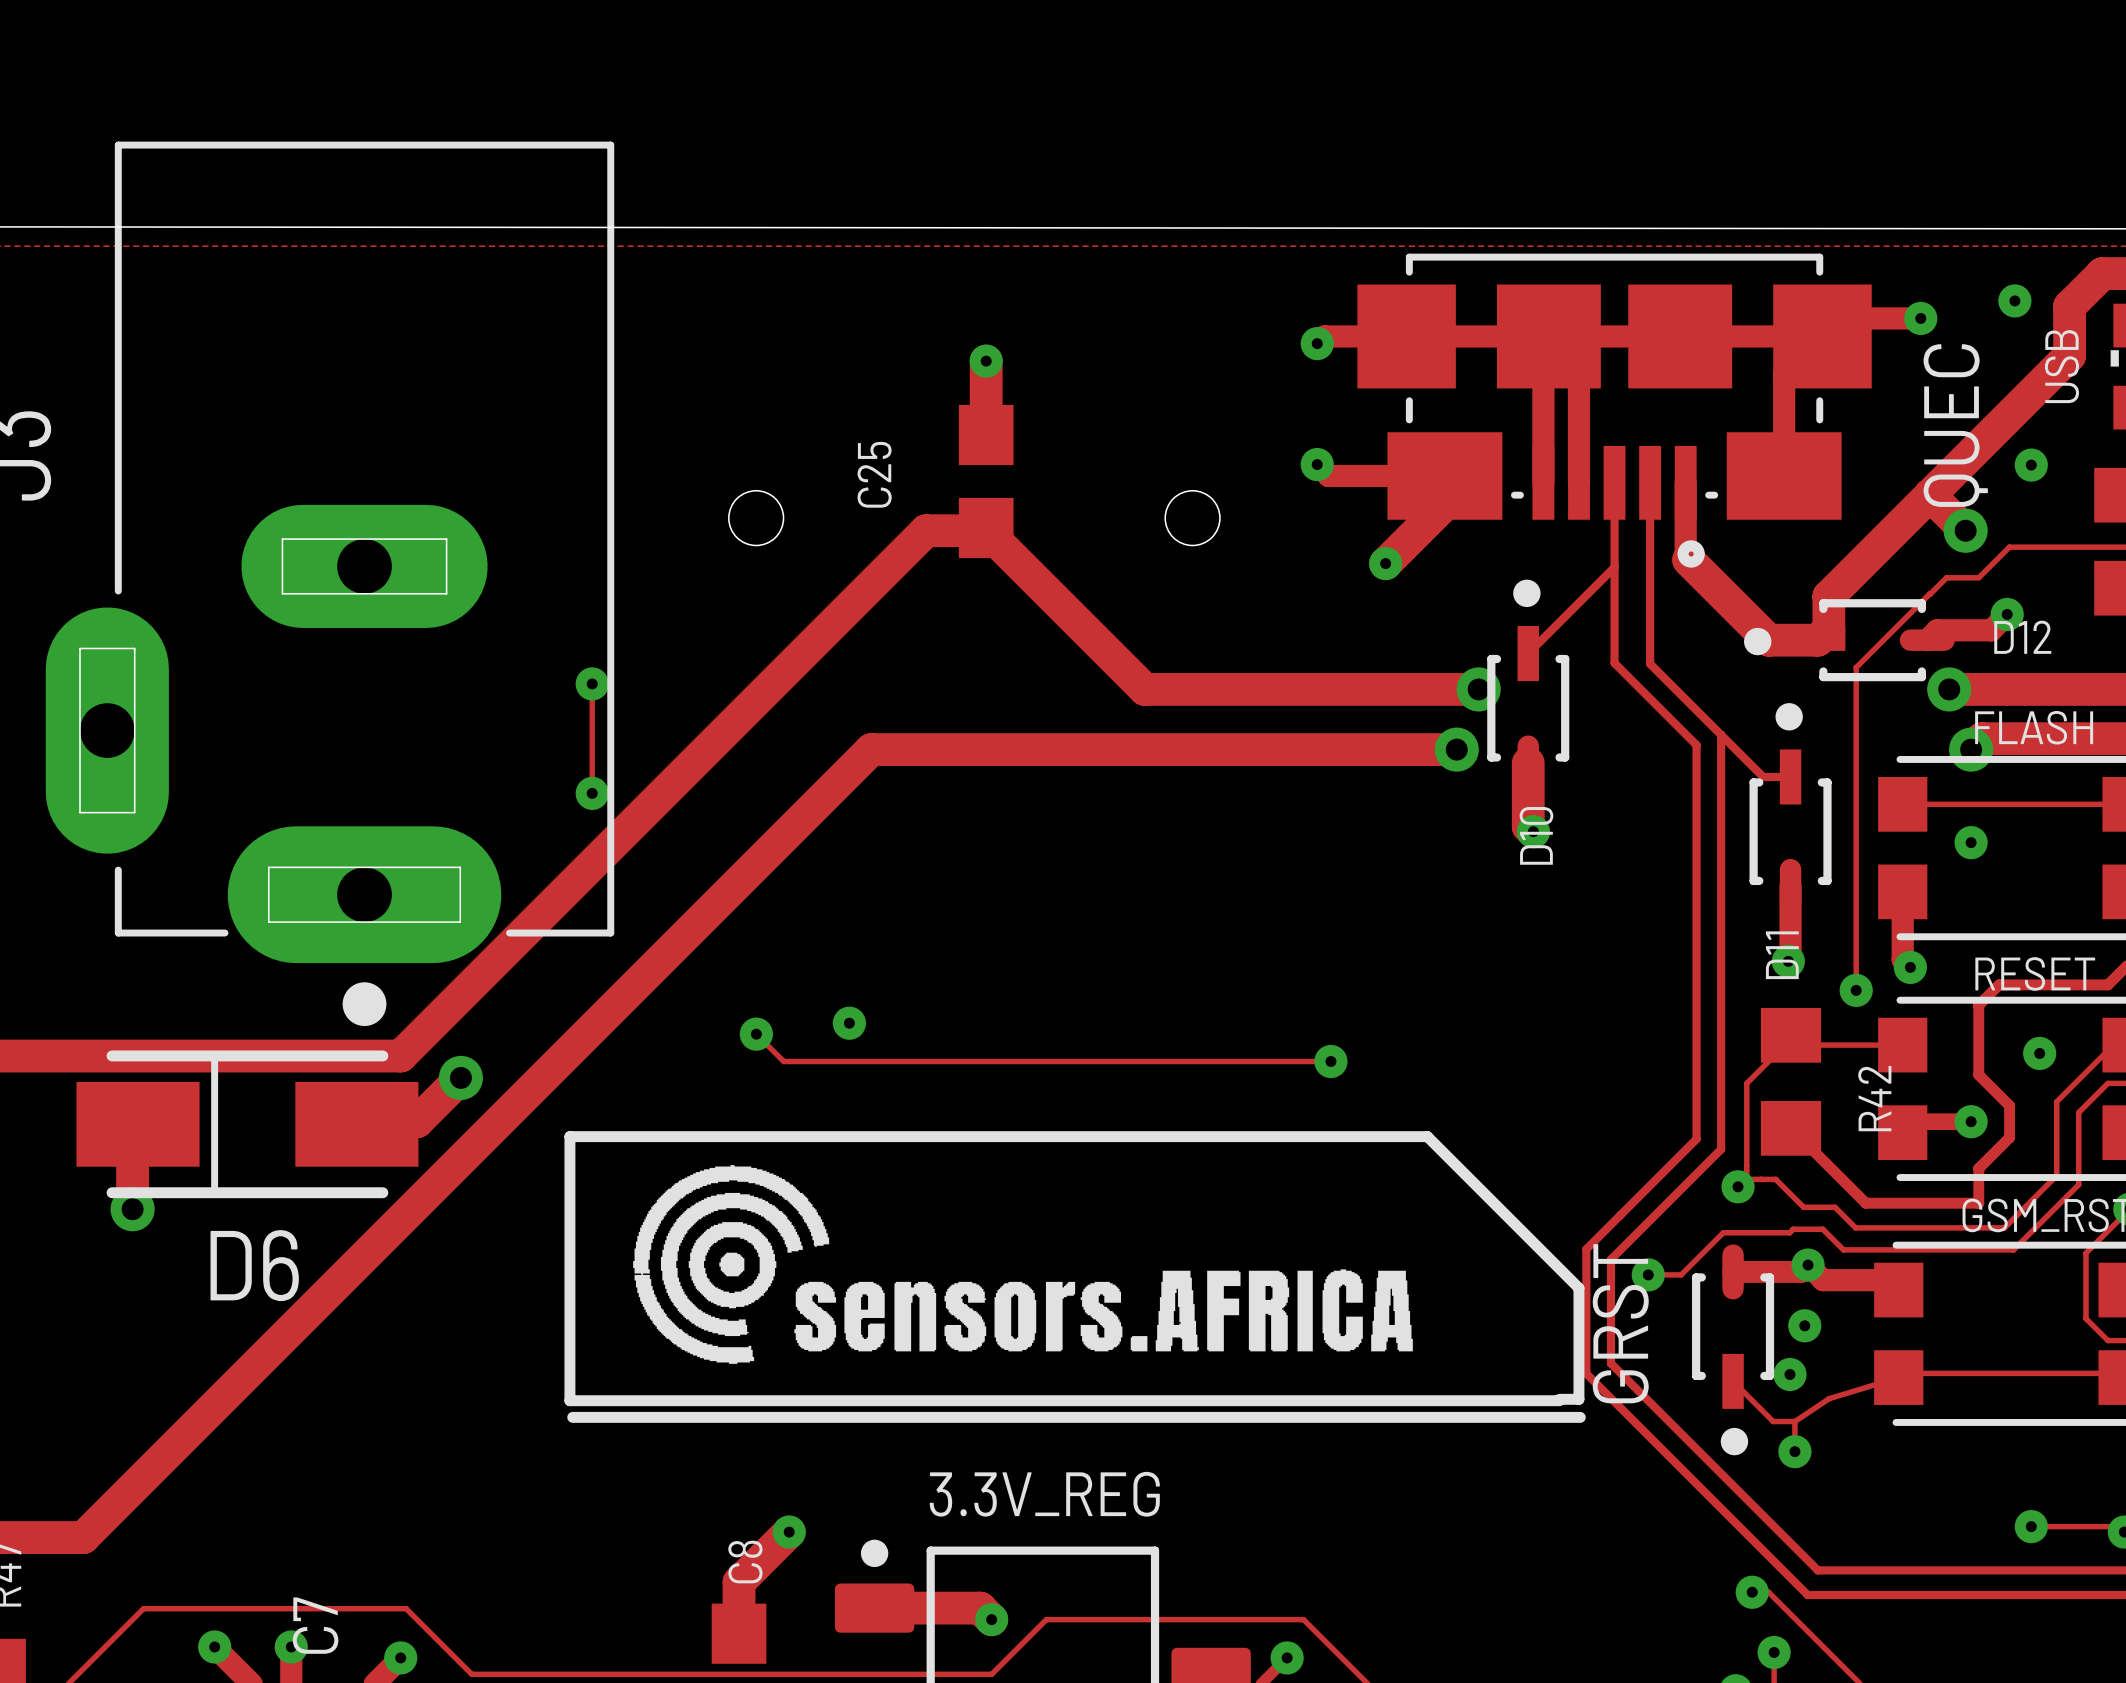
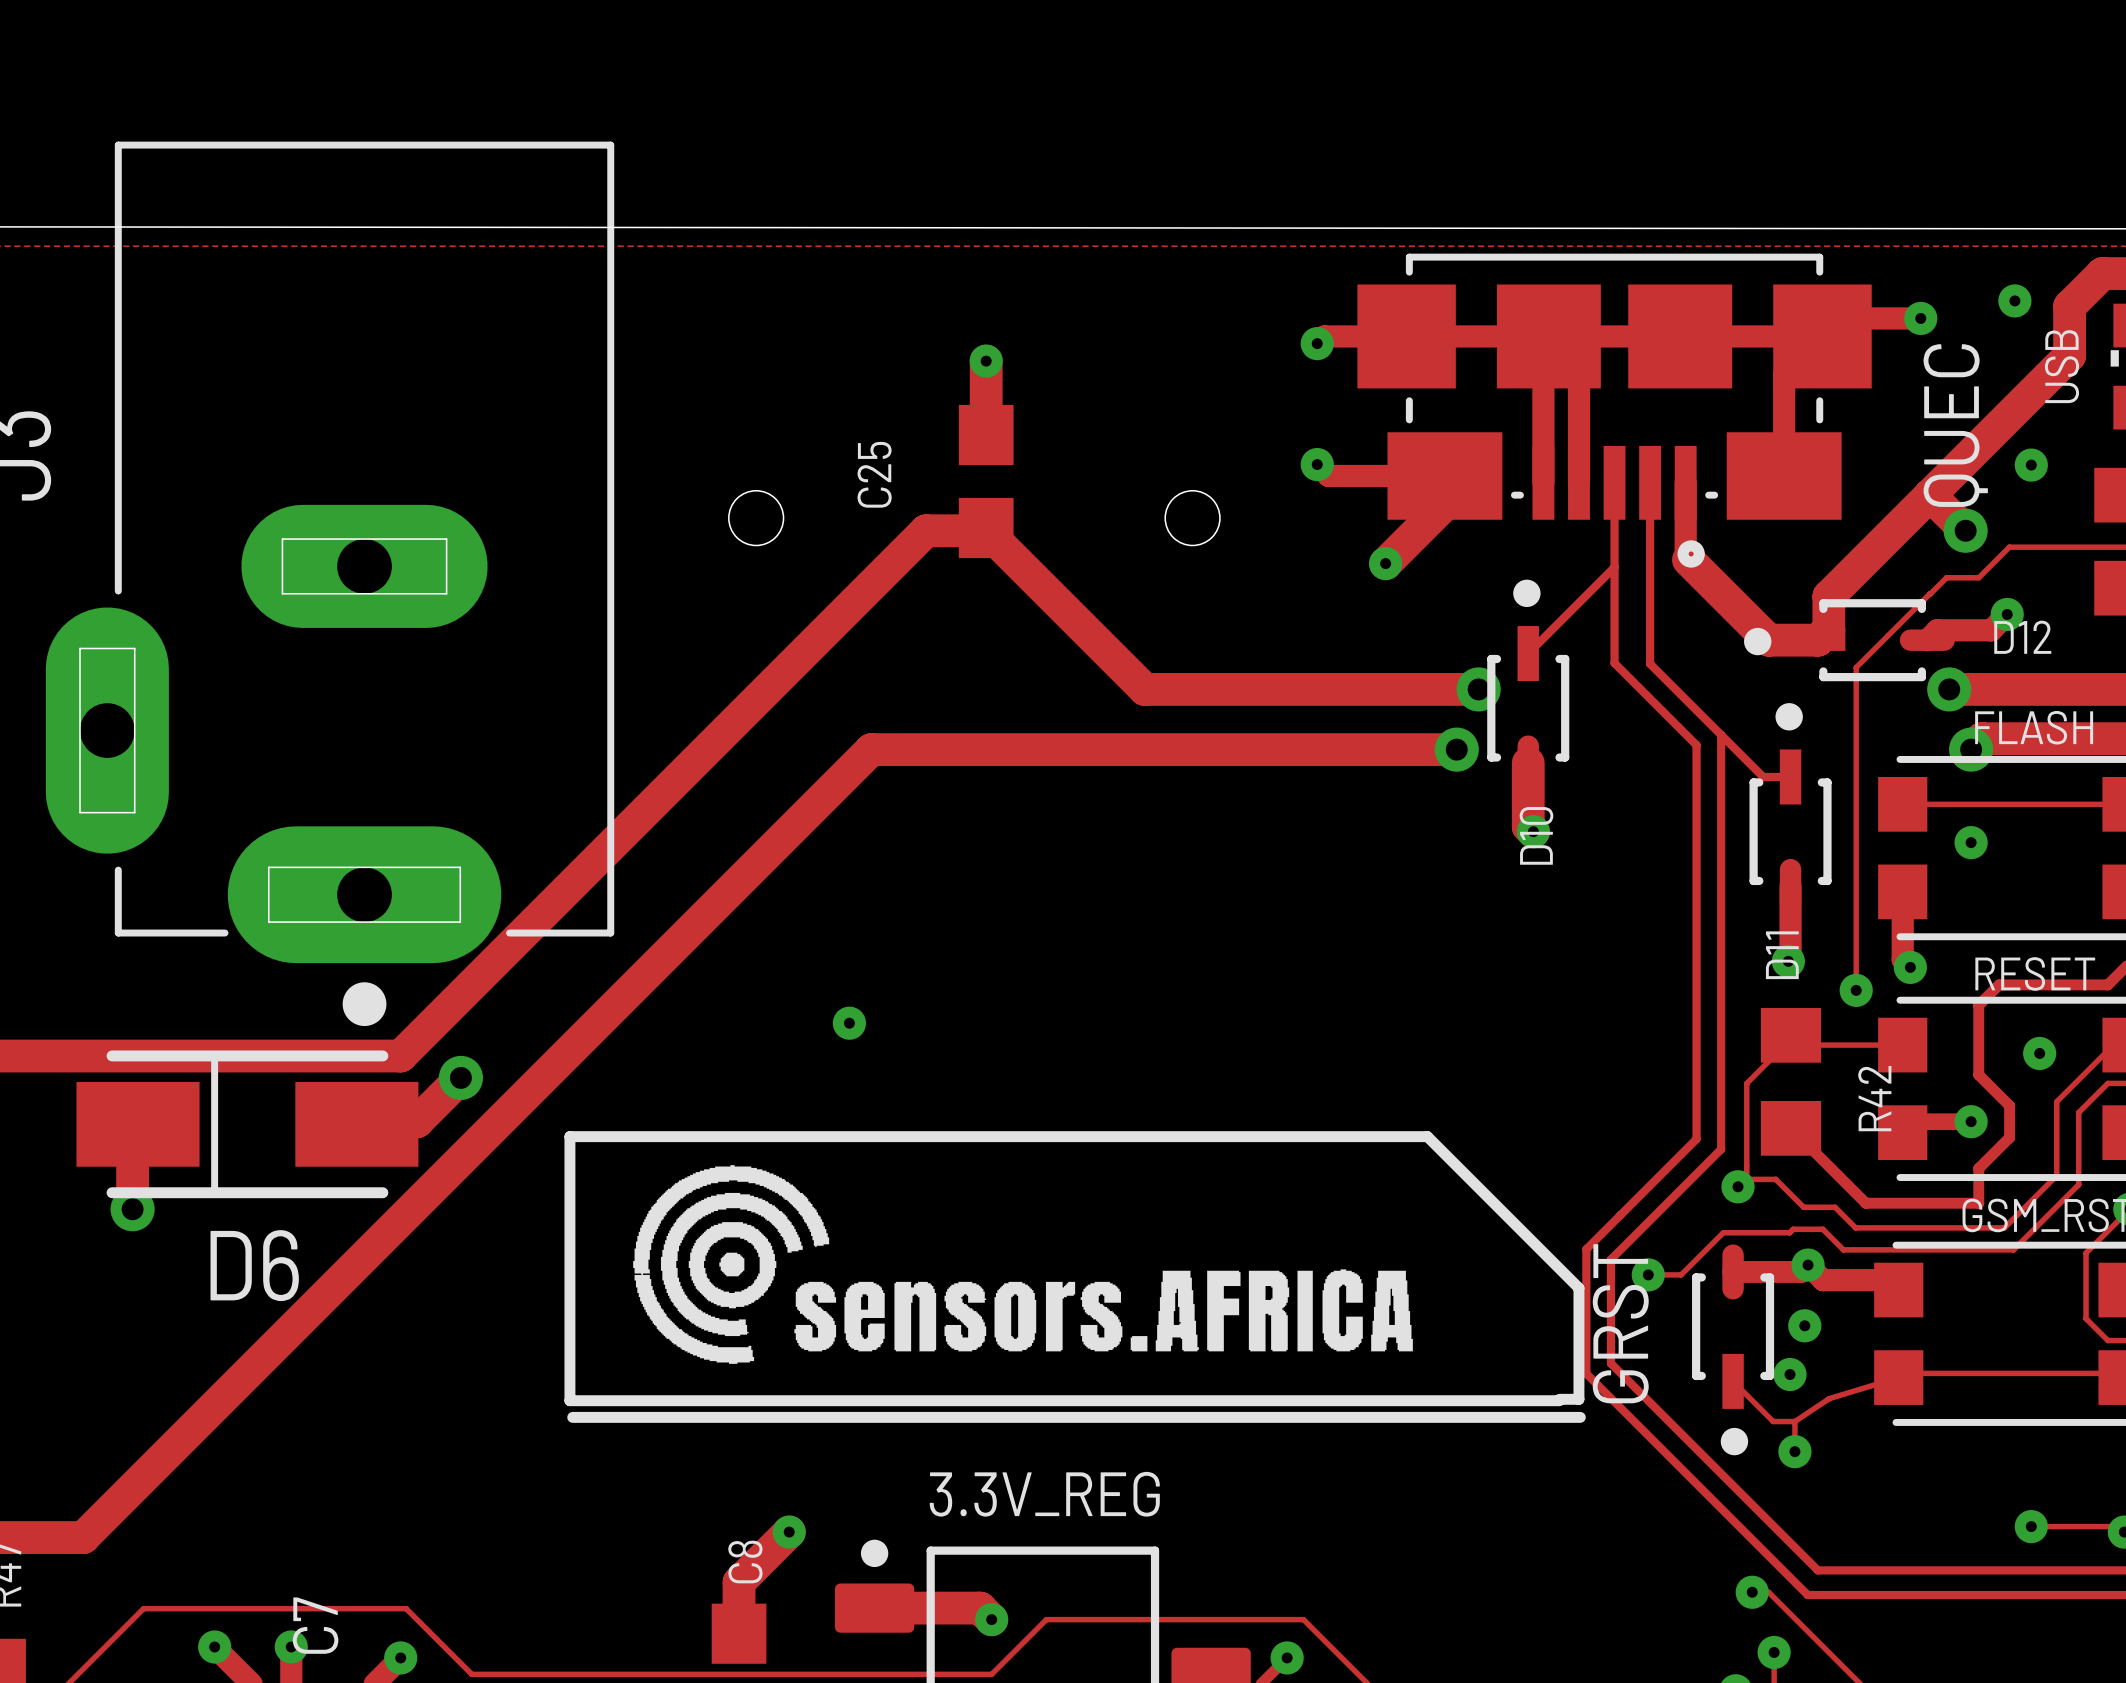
track: (592, 683) (592, 793) -> none
via: (592, 683) -> none
via: (592, 793) -> none
track: (756, 1034) (783, 1061) (1330, 1061) -> none
via: (756, 1034) -> none
via: (1330, 1061) -> none

